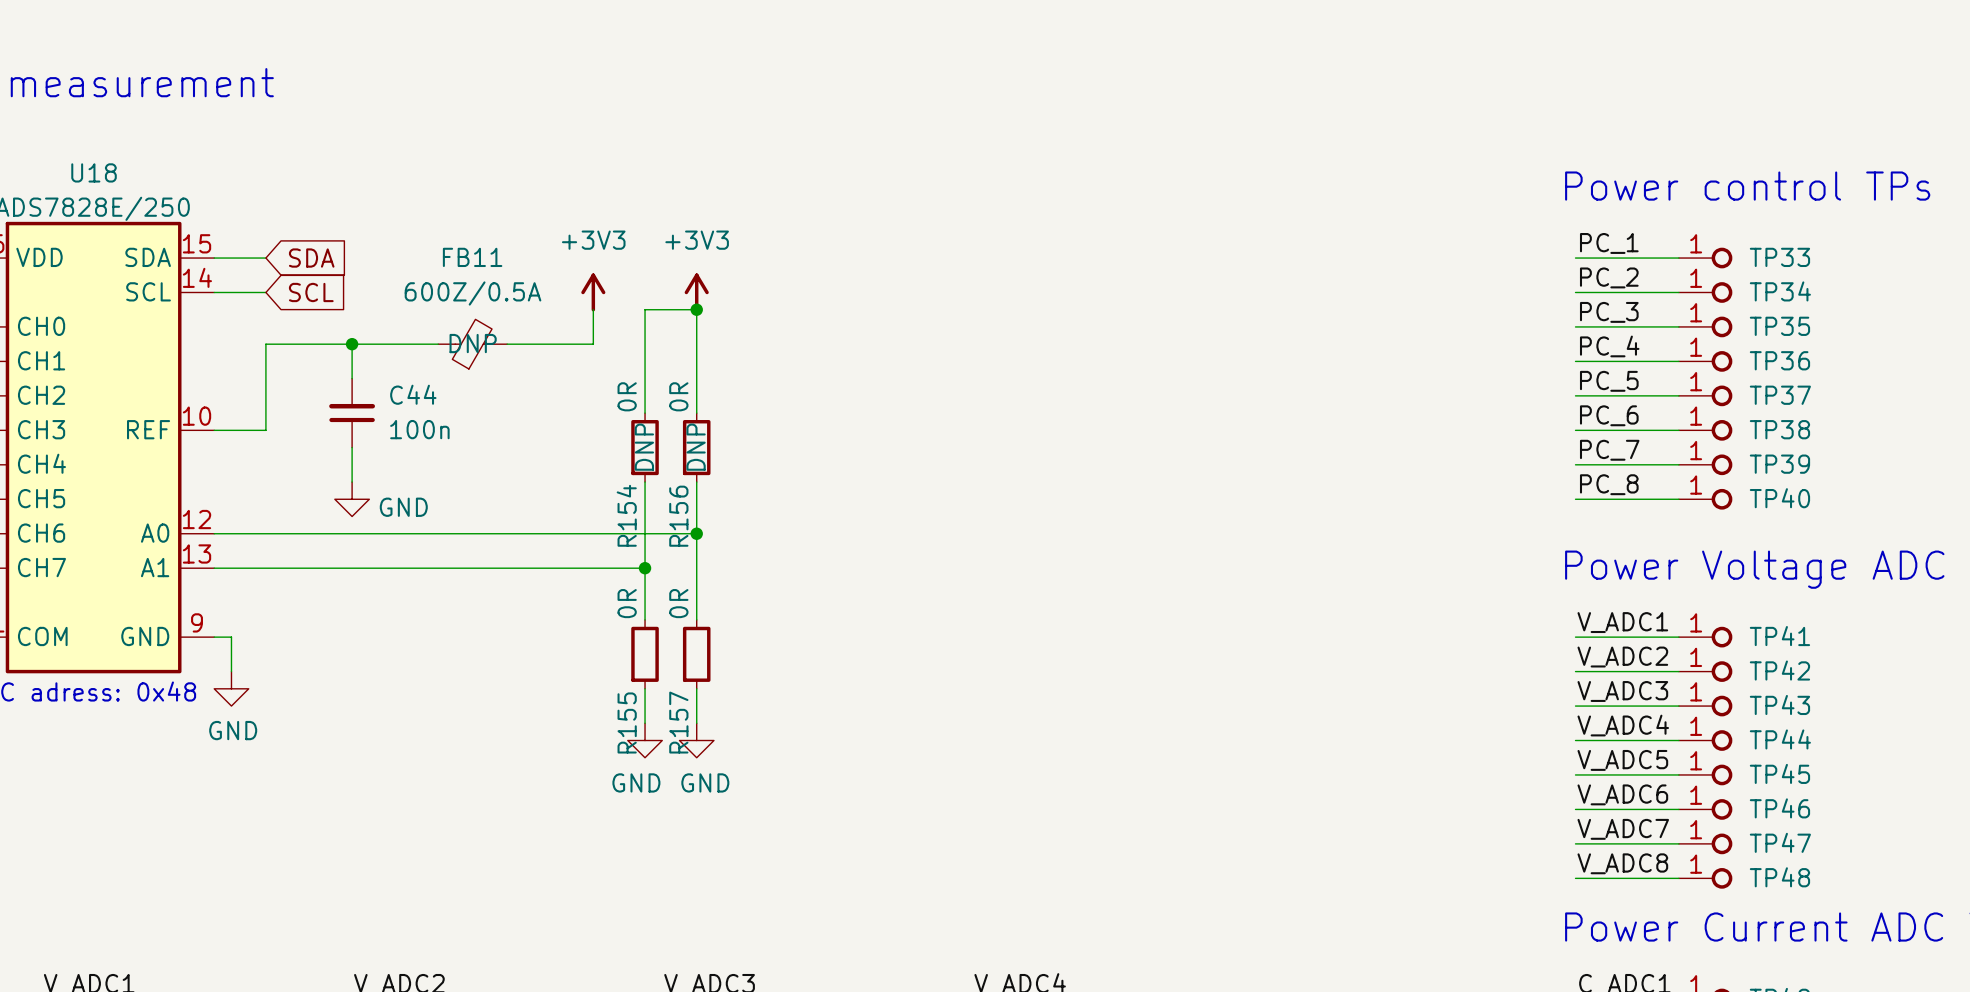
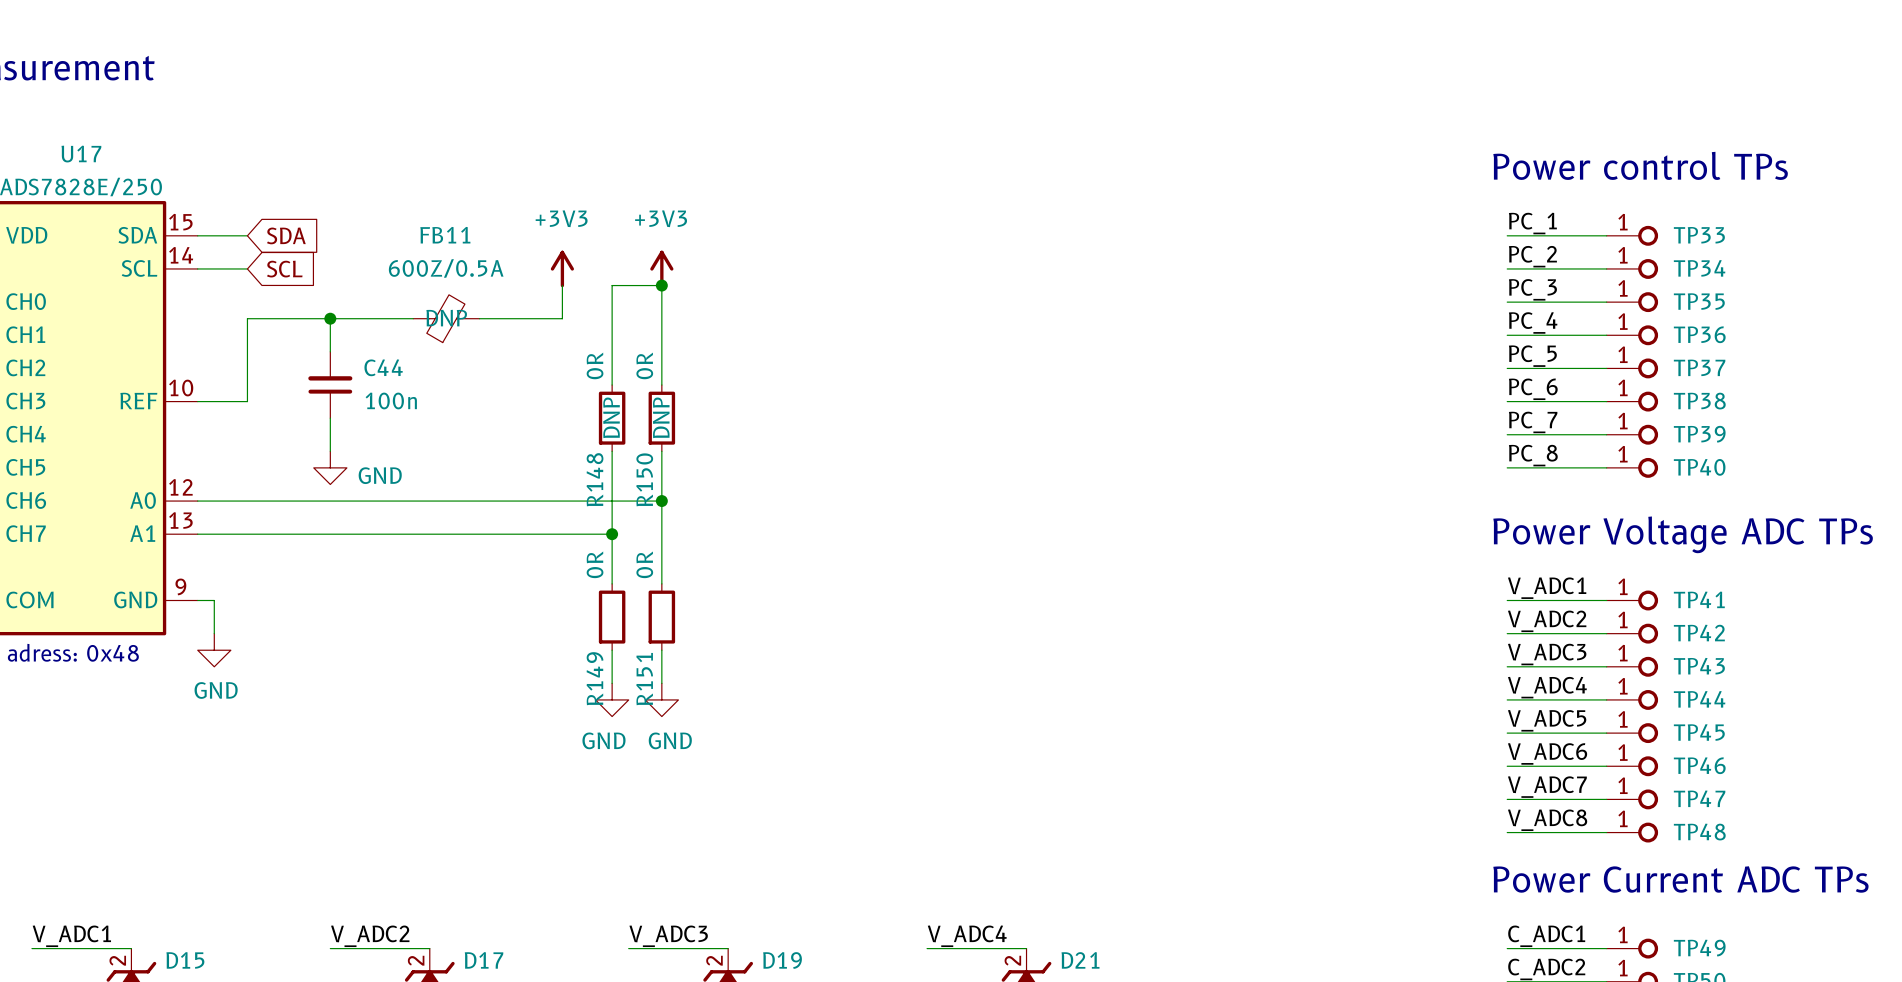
U18 name: U18 (94, 172) -> U17 (81, 154)
R154 name: R154 (626, 515) -> R148 (595, 479)
R156 name: R156 (678, 516) -> R150 (644, 479)
R155 name: R155 (627, 722) -> R149 (595, 678)
R157 name: R157 (678, 722) -> R151 (644, 679)

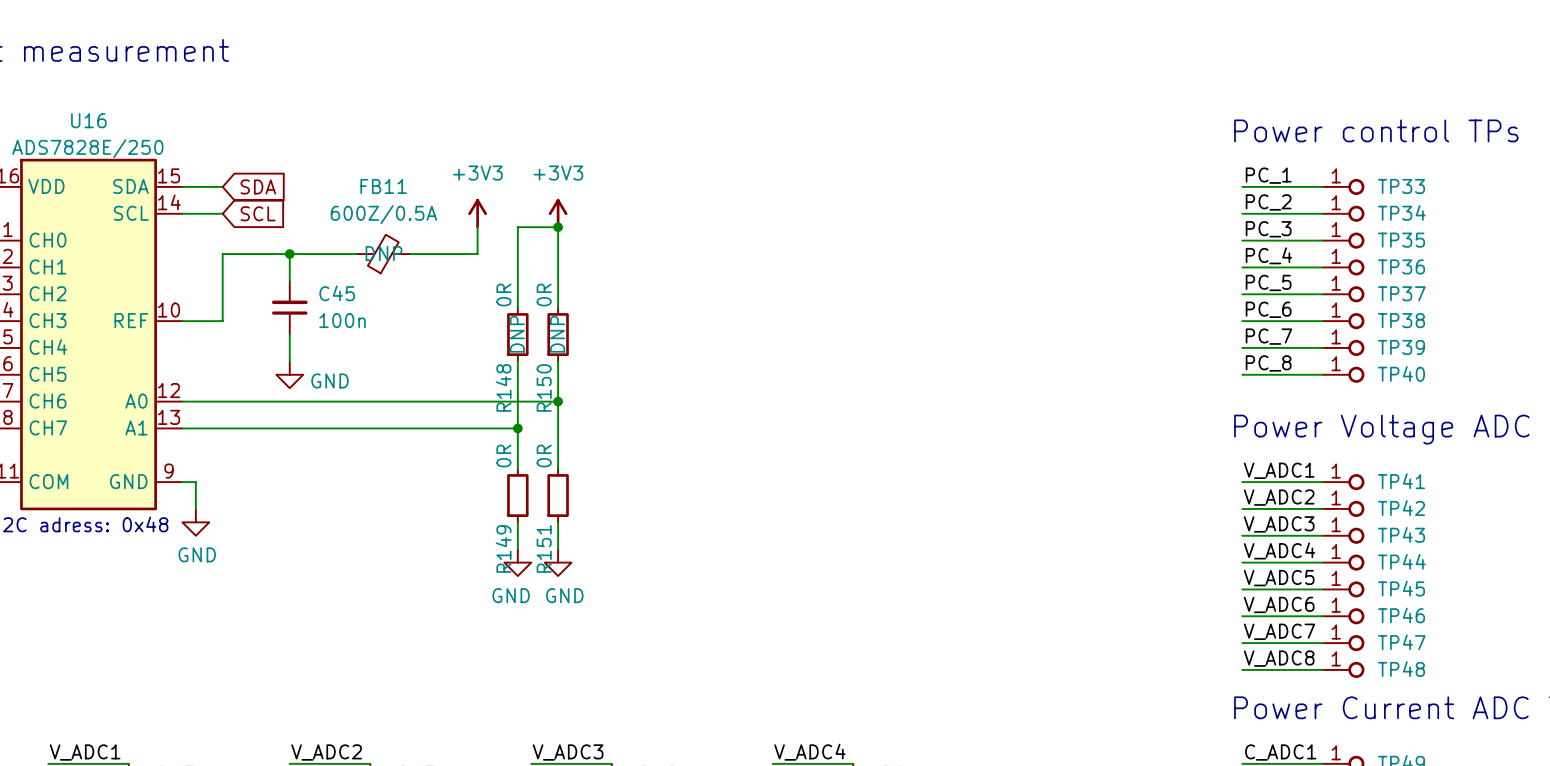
U17 name: U17 (81, 154) -> U16 (88, 120)
C44 name: C44 (383, 367) -> C45 (337, 293)

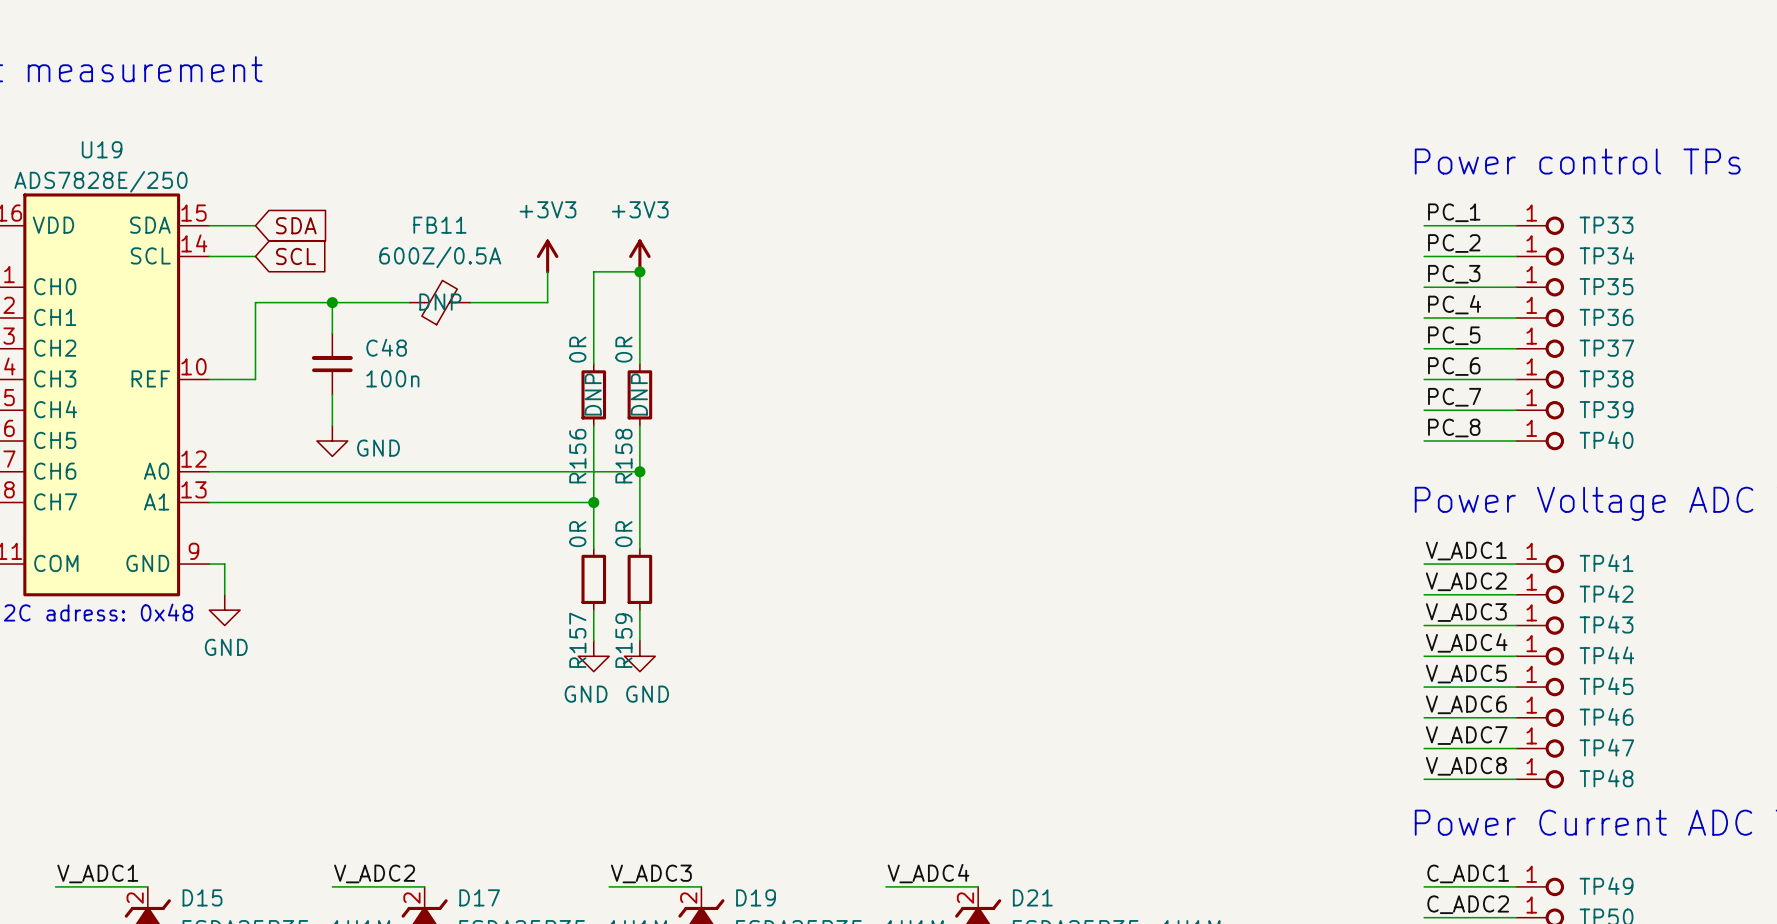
U16 name: U16 (88, 120) -> U19 (102, 149)
C45 name: C45 (337, 293) -> C48 (386, 347)
R148 name: R148 (503, 387) -> R156 (577, 456)
R150 name: R150 (544, 387) -> R158 (623, 456)
R149 name: R149 (503, 548) -> R157 (577, 640)
R151 name: R151 (544, 548) -> R159 (623, 640)

